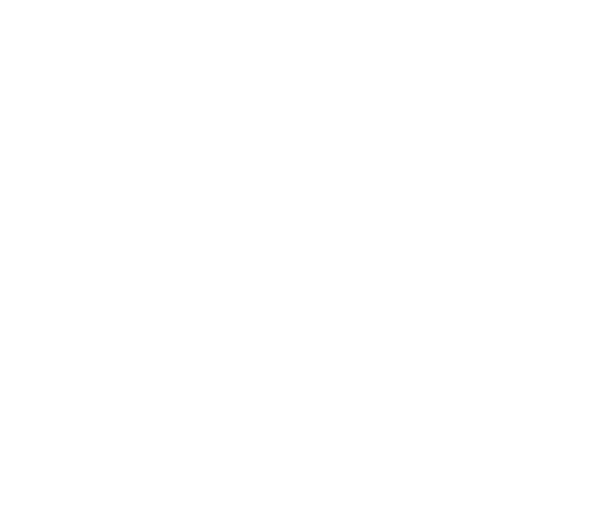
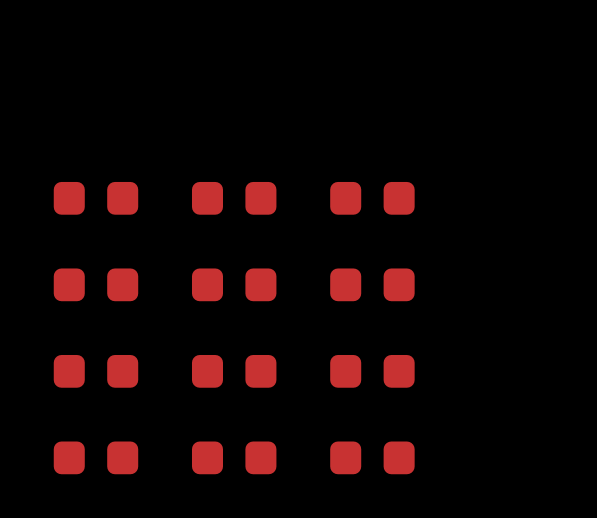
part: none -> (95, 198)
part: none -> (234, 198)
part: none -> (372, 198)
part: none -> (95, 284)
part: none -> (234, 284)
part: none -> (372, 284)
part: none -> (95, 371)
part: none -> (234, 371)
part: none -> (372, 371)
part: none -> (95, 457)
part: none -> (234, 457)
part: none -> (372, 457)

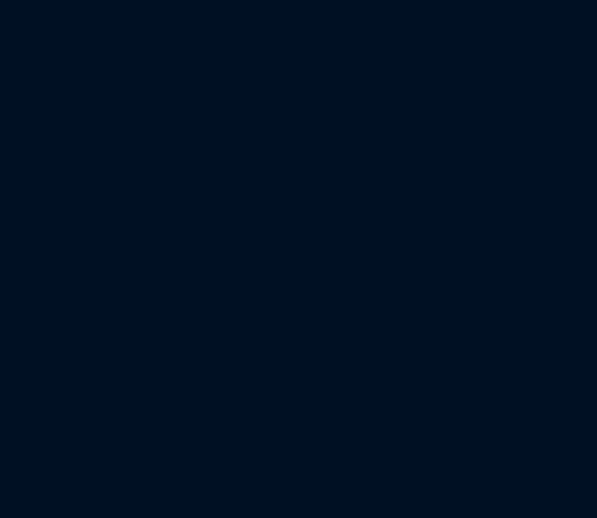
part: (95, 198) -> none
part: (234, 198) -> none
part: (372, 198) -> none
part: (95, 284) -> none
part: (234, 284) -> none
part: (372, 284) -> none
part: (95, 371) -> none
part: (234, 371) -> none
part: (372, 371) -> none
part: (95, 457) -> none
part: (234, 457) -> none
part: (372, 457) -> none

